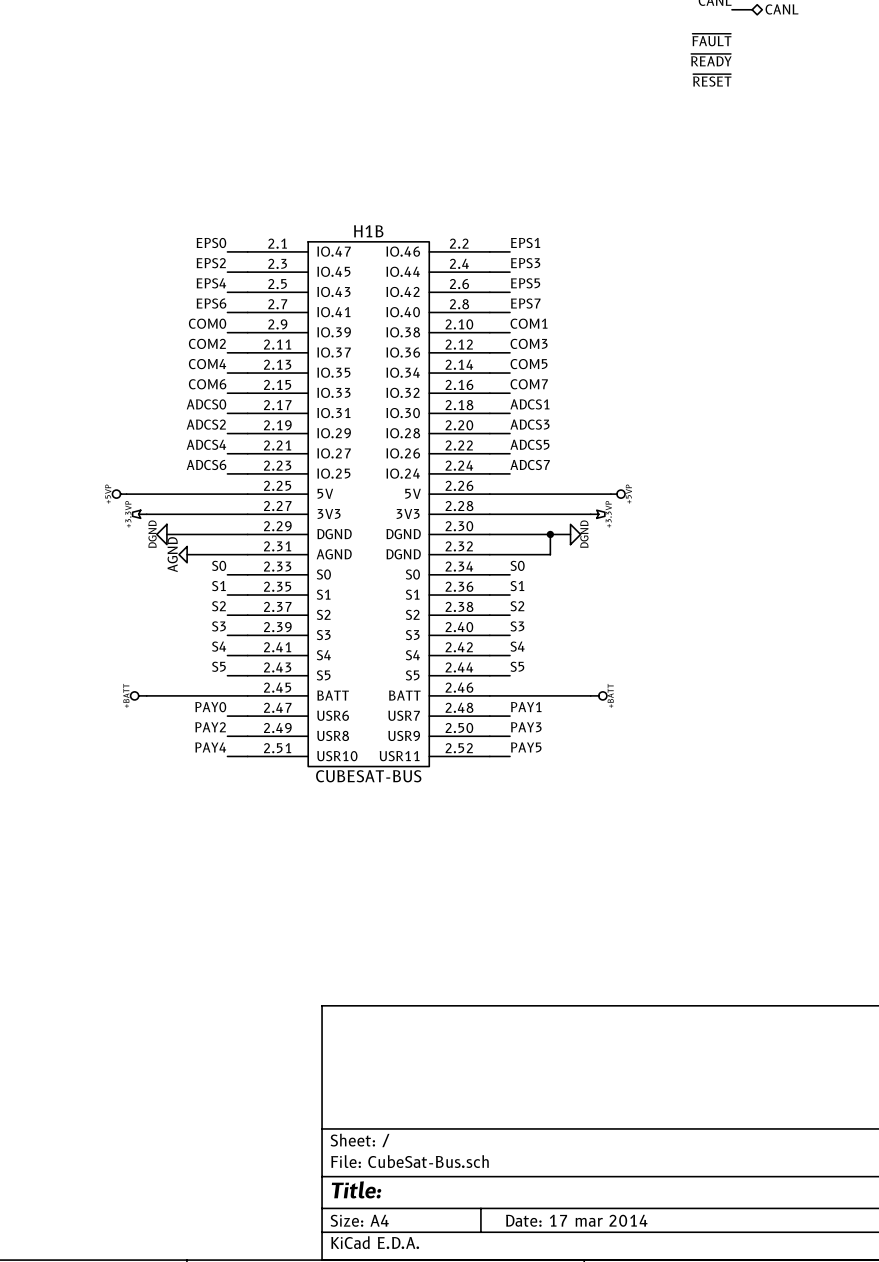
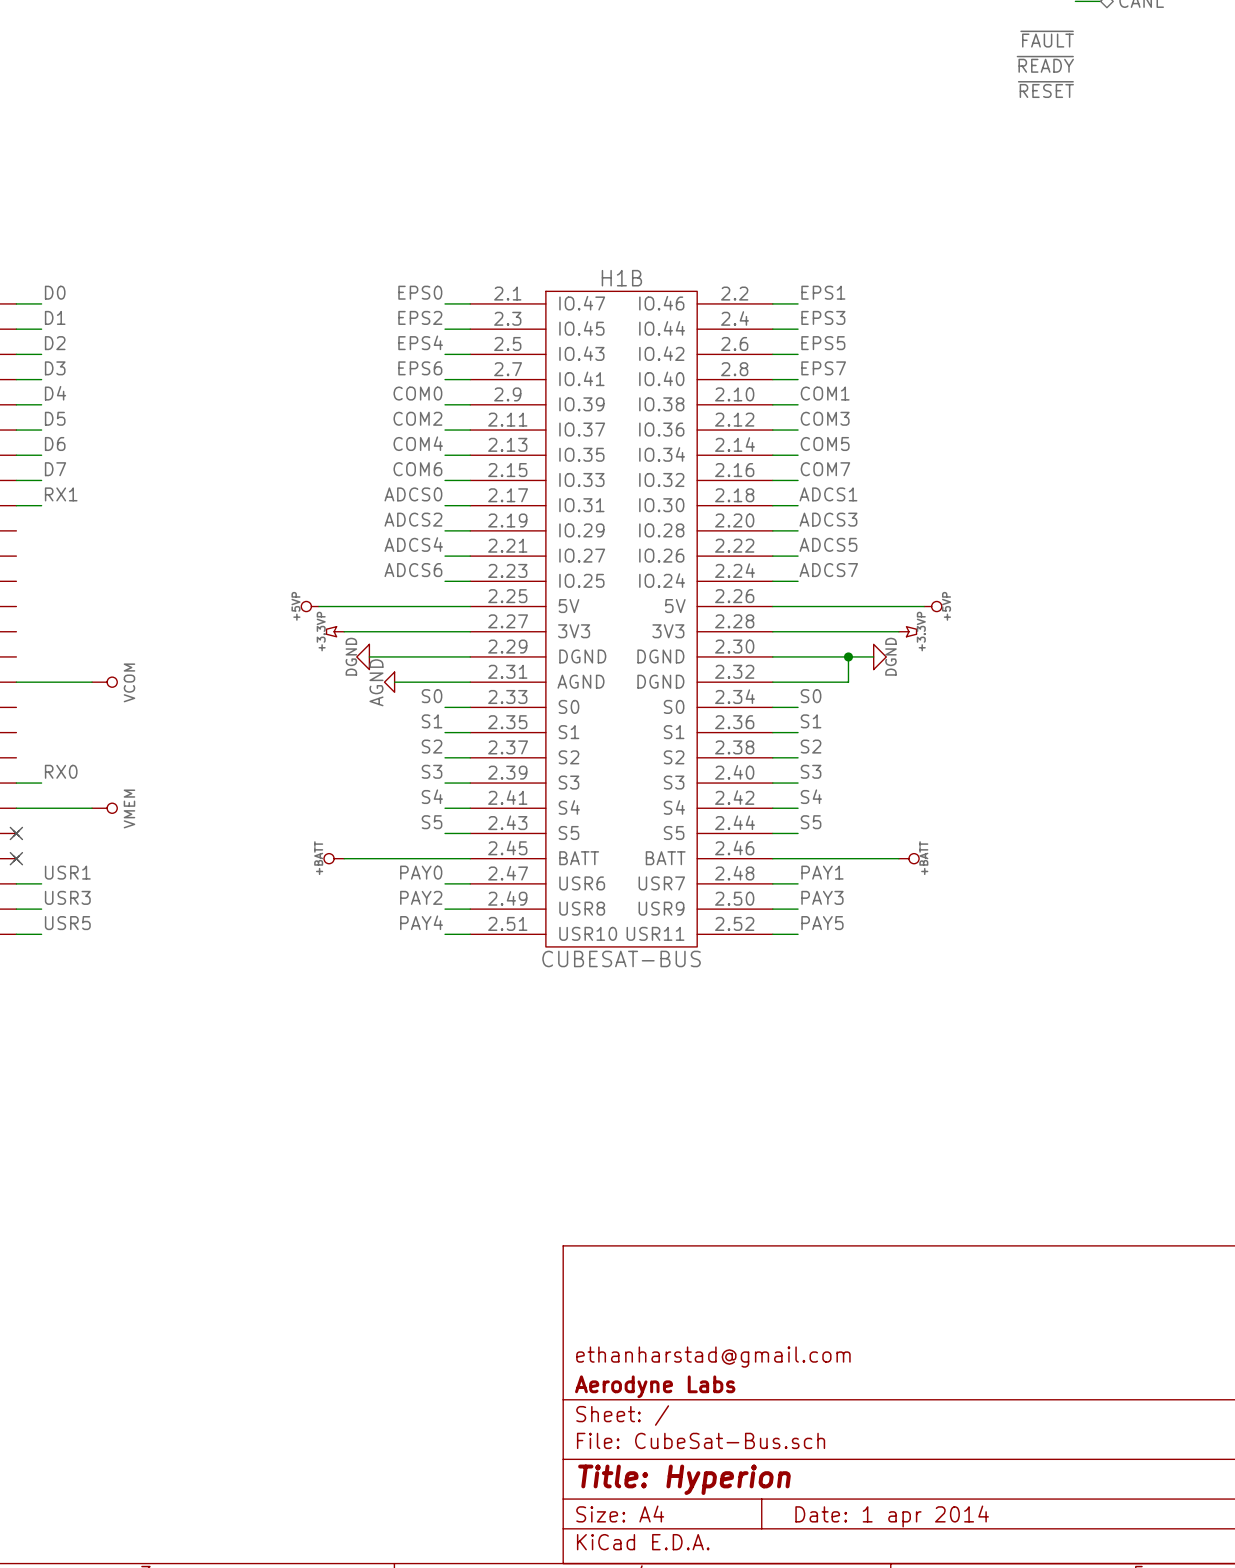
title block: none -> ethanharstad@gmail.com (713, 1357)
title block: none -> Aerodyne Labs (655, 1386)
title block: Title: (356, 1189) -> Title: Hyperion (684, 1479)
title block: Date: 17 mar 2014 (576, 1220) -> Date: 1 apr 2014 (892, 1516)

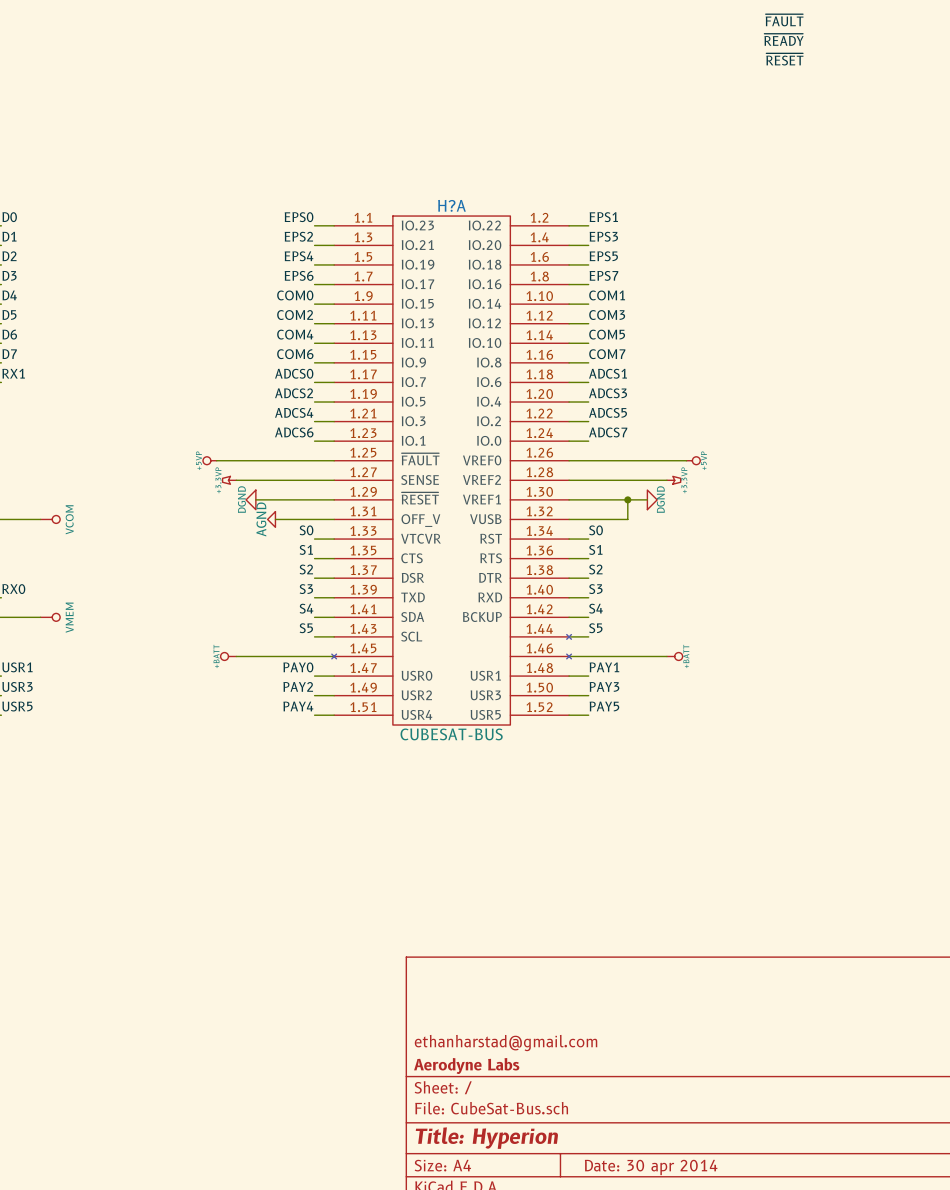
H1B: CUBESAT-BUS (621, 619) -> none
H?A: none -> CUBESAT-BUS (451, 470)
title block: Date: 1 apr 2014 (892, 1516) -> Date: 30 apr 2014 (651, 1167)

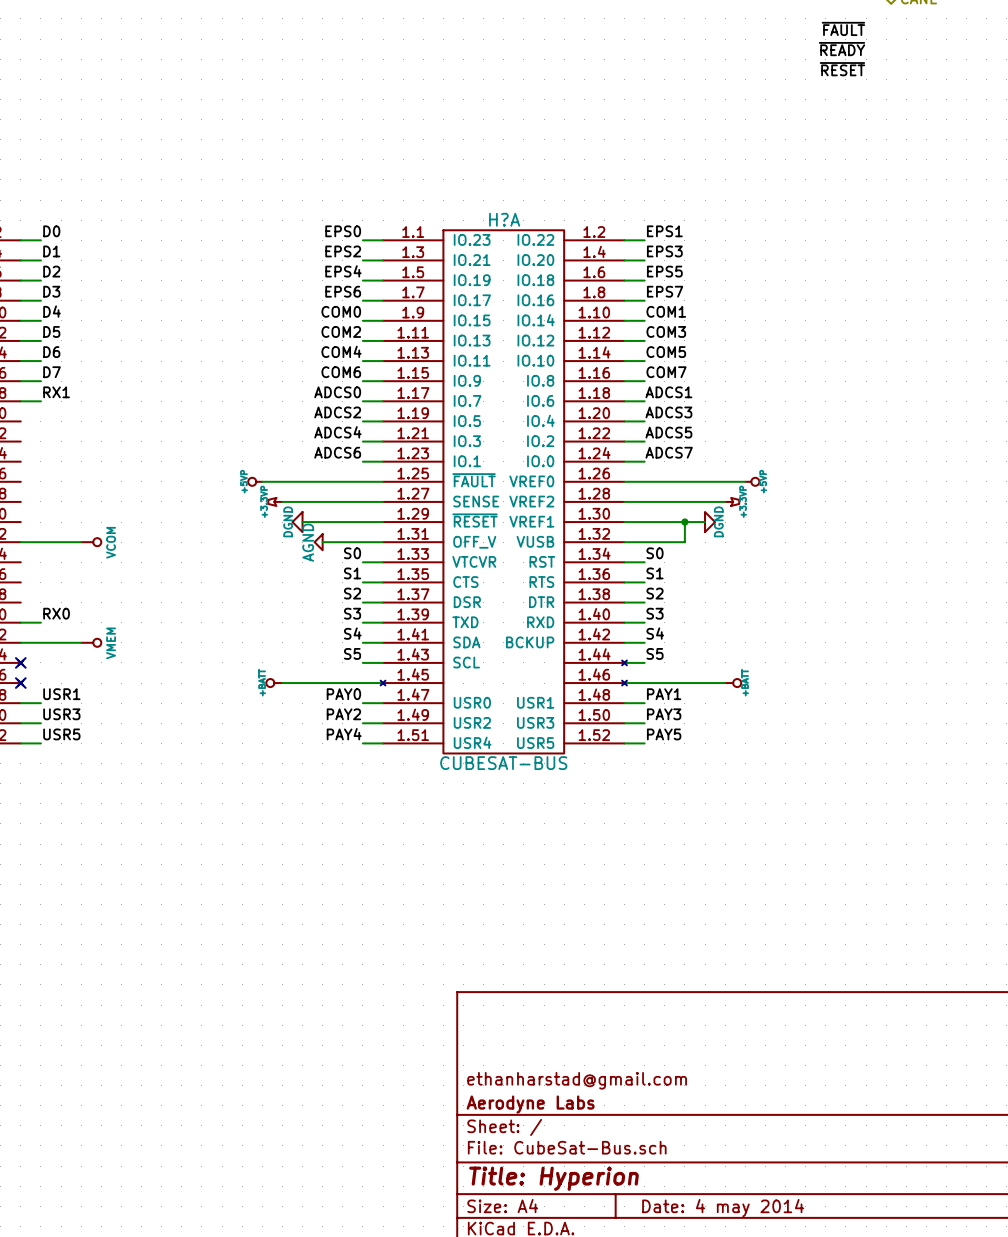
title block: Date: 30 apr 2014 (651, 1167) -> Date: 4 may 2014 (723, 1208)

